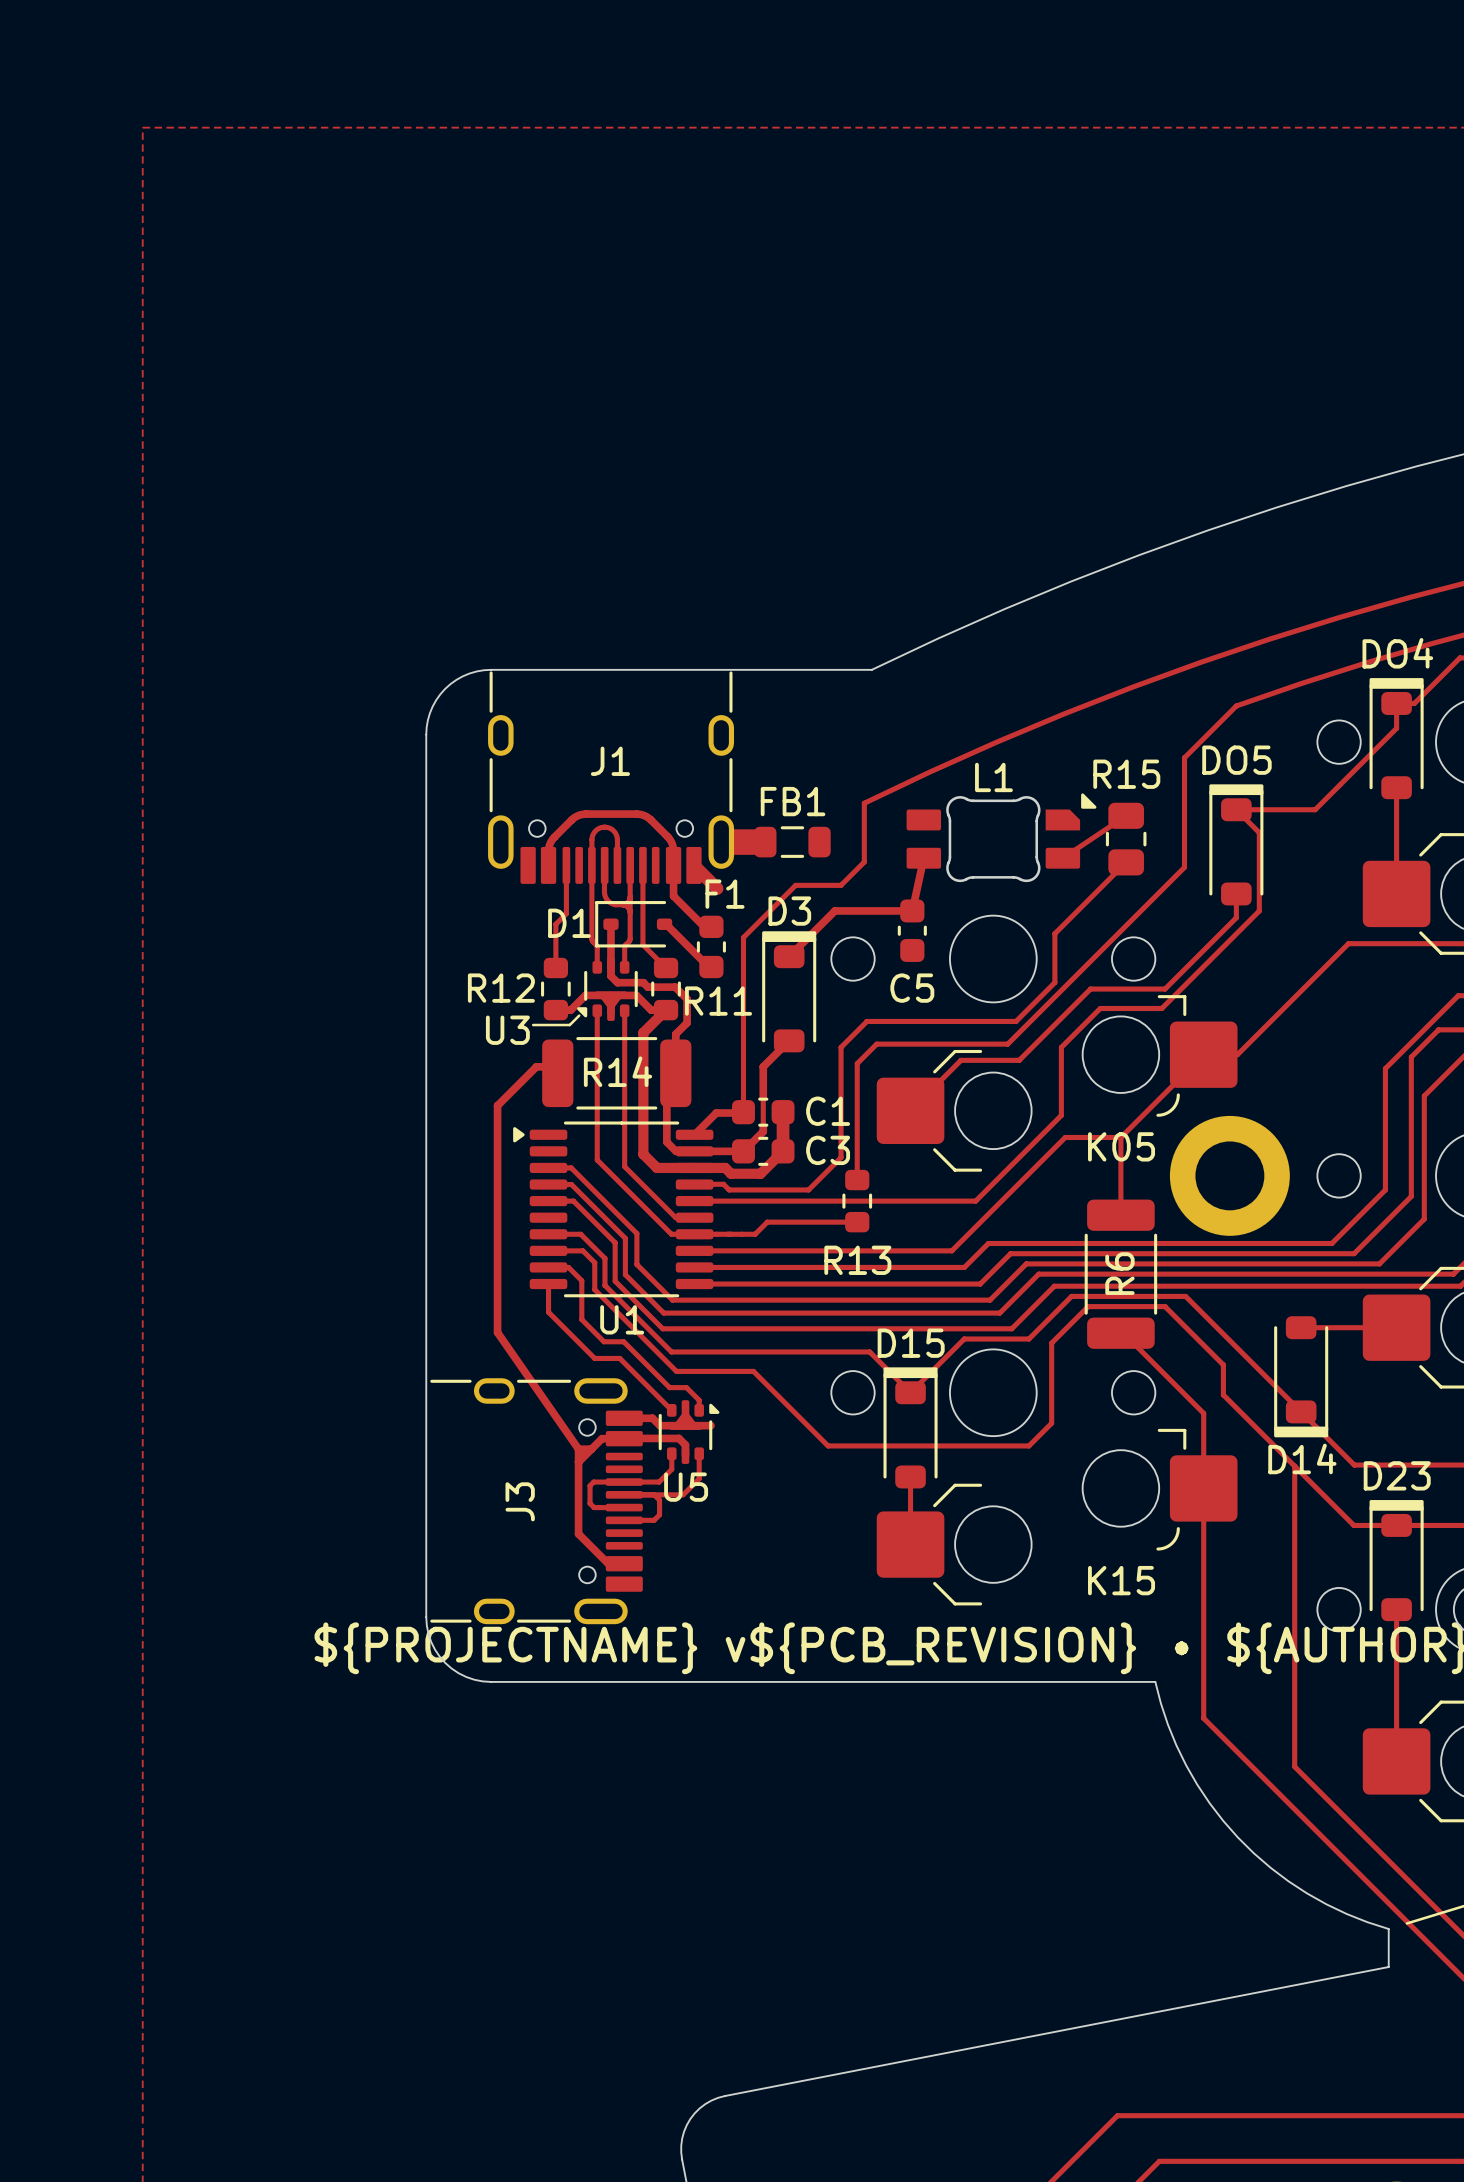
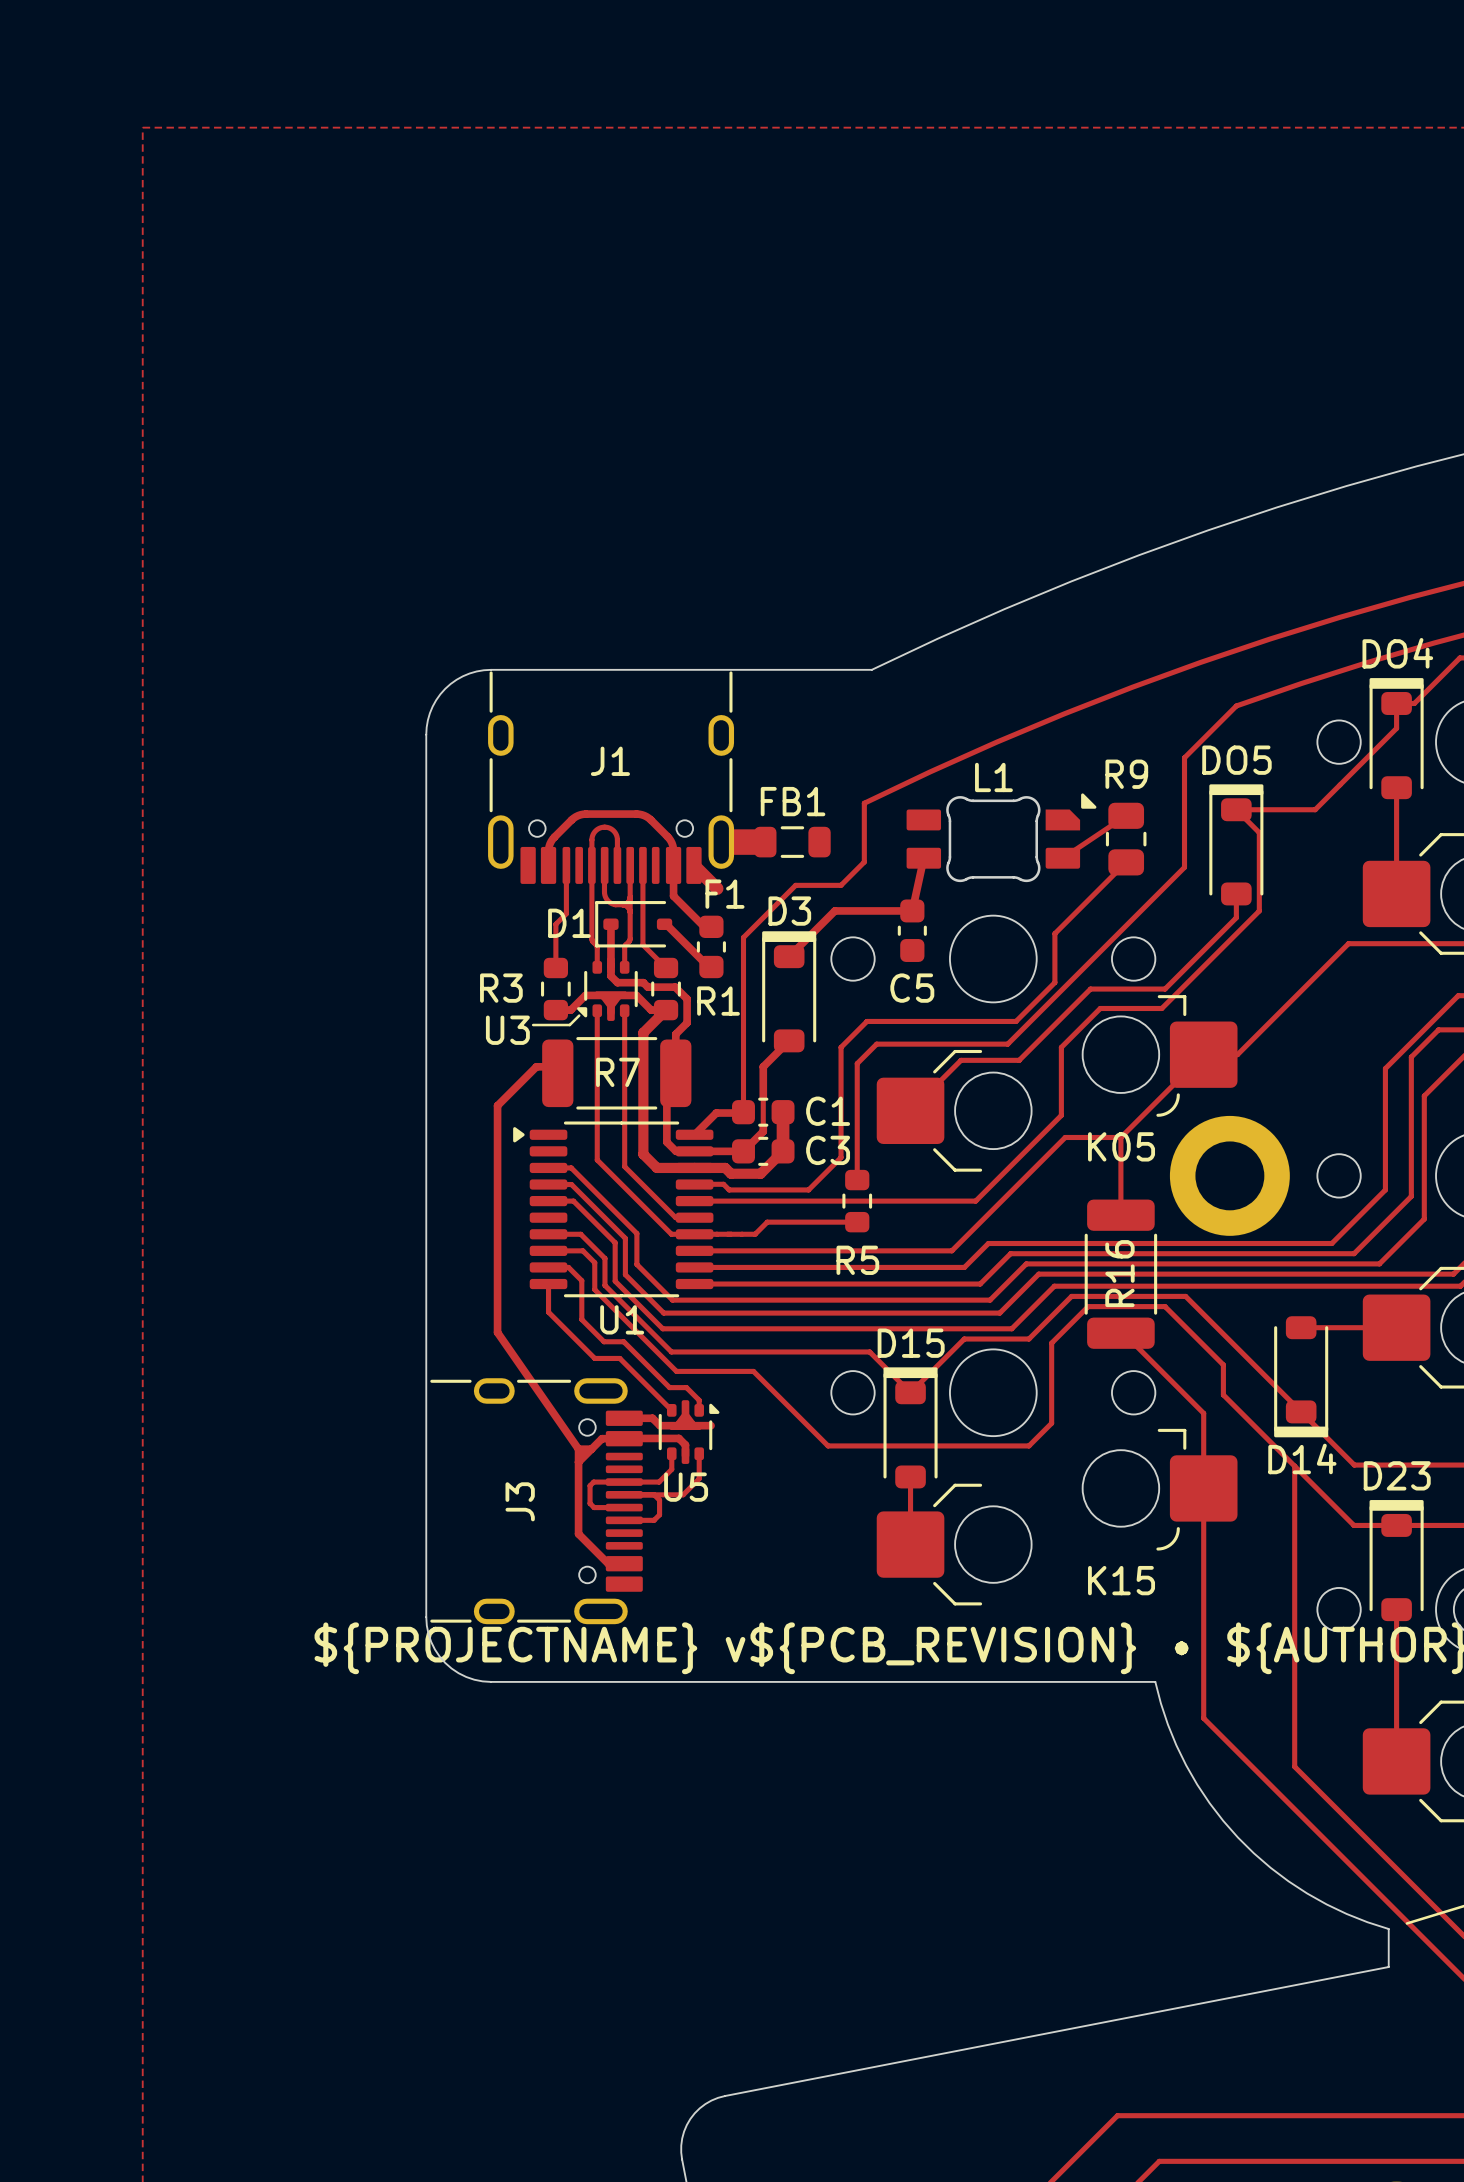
R15 name: R15 (1126, 774) -> R9 (1126, 774)
R12 name: R12 (501, 988) -> R3 (501, 988)
R11 name: R11 (718, 1001) -> R1 (718, 1001)
R14 name: R14 (618, 1071) -> R7 (618, 1072)
R13 name: R13 (857, 1260) -> R5 (857, 1260)
R6 name: R6 (1119, 1273) -> R16 (1119, 1273)

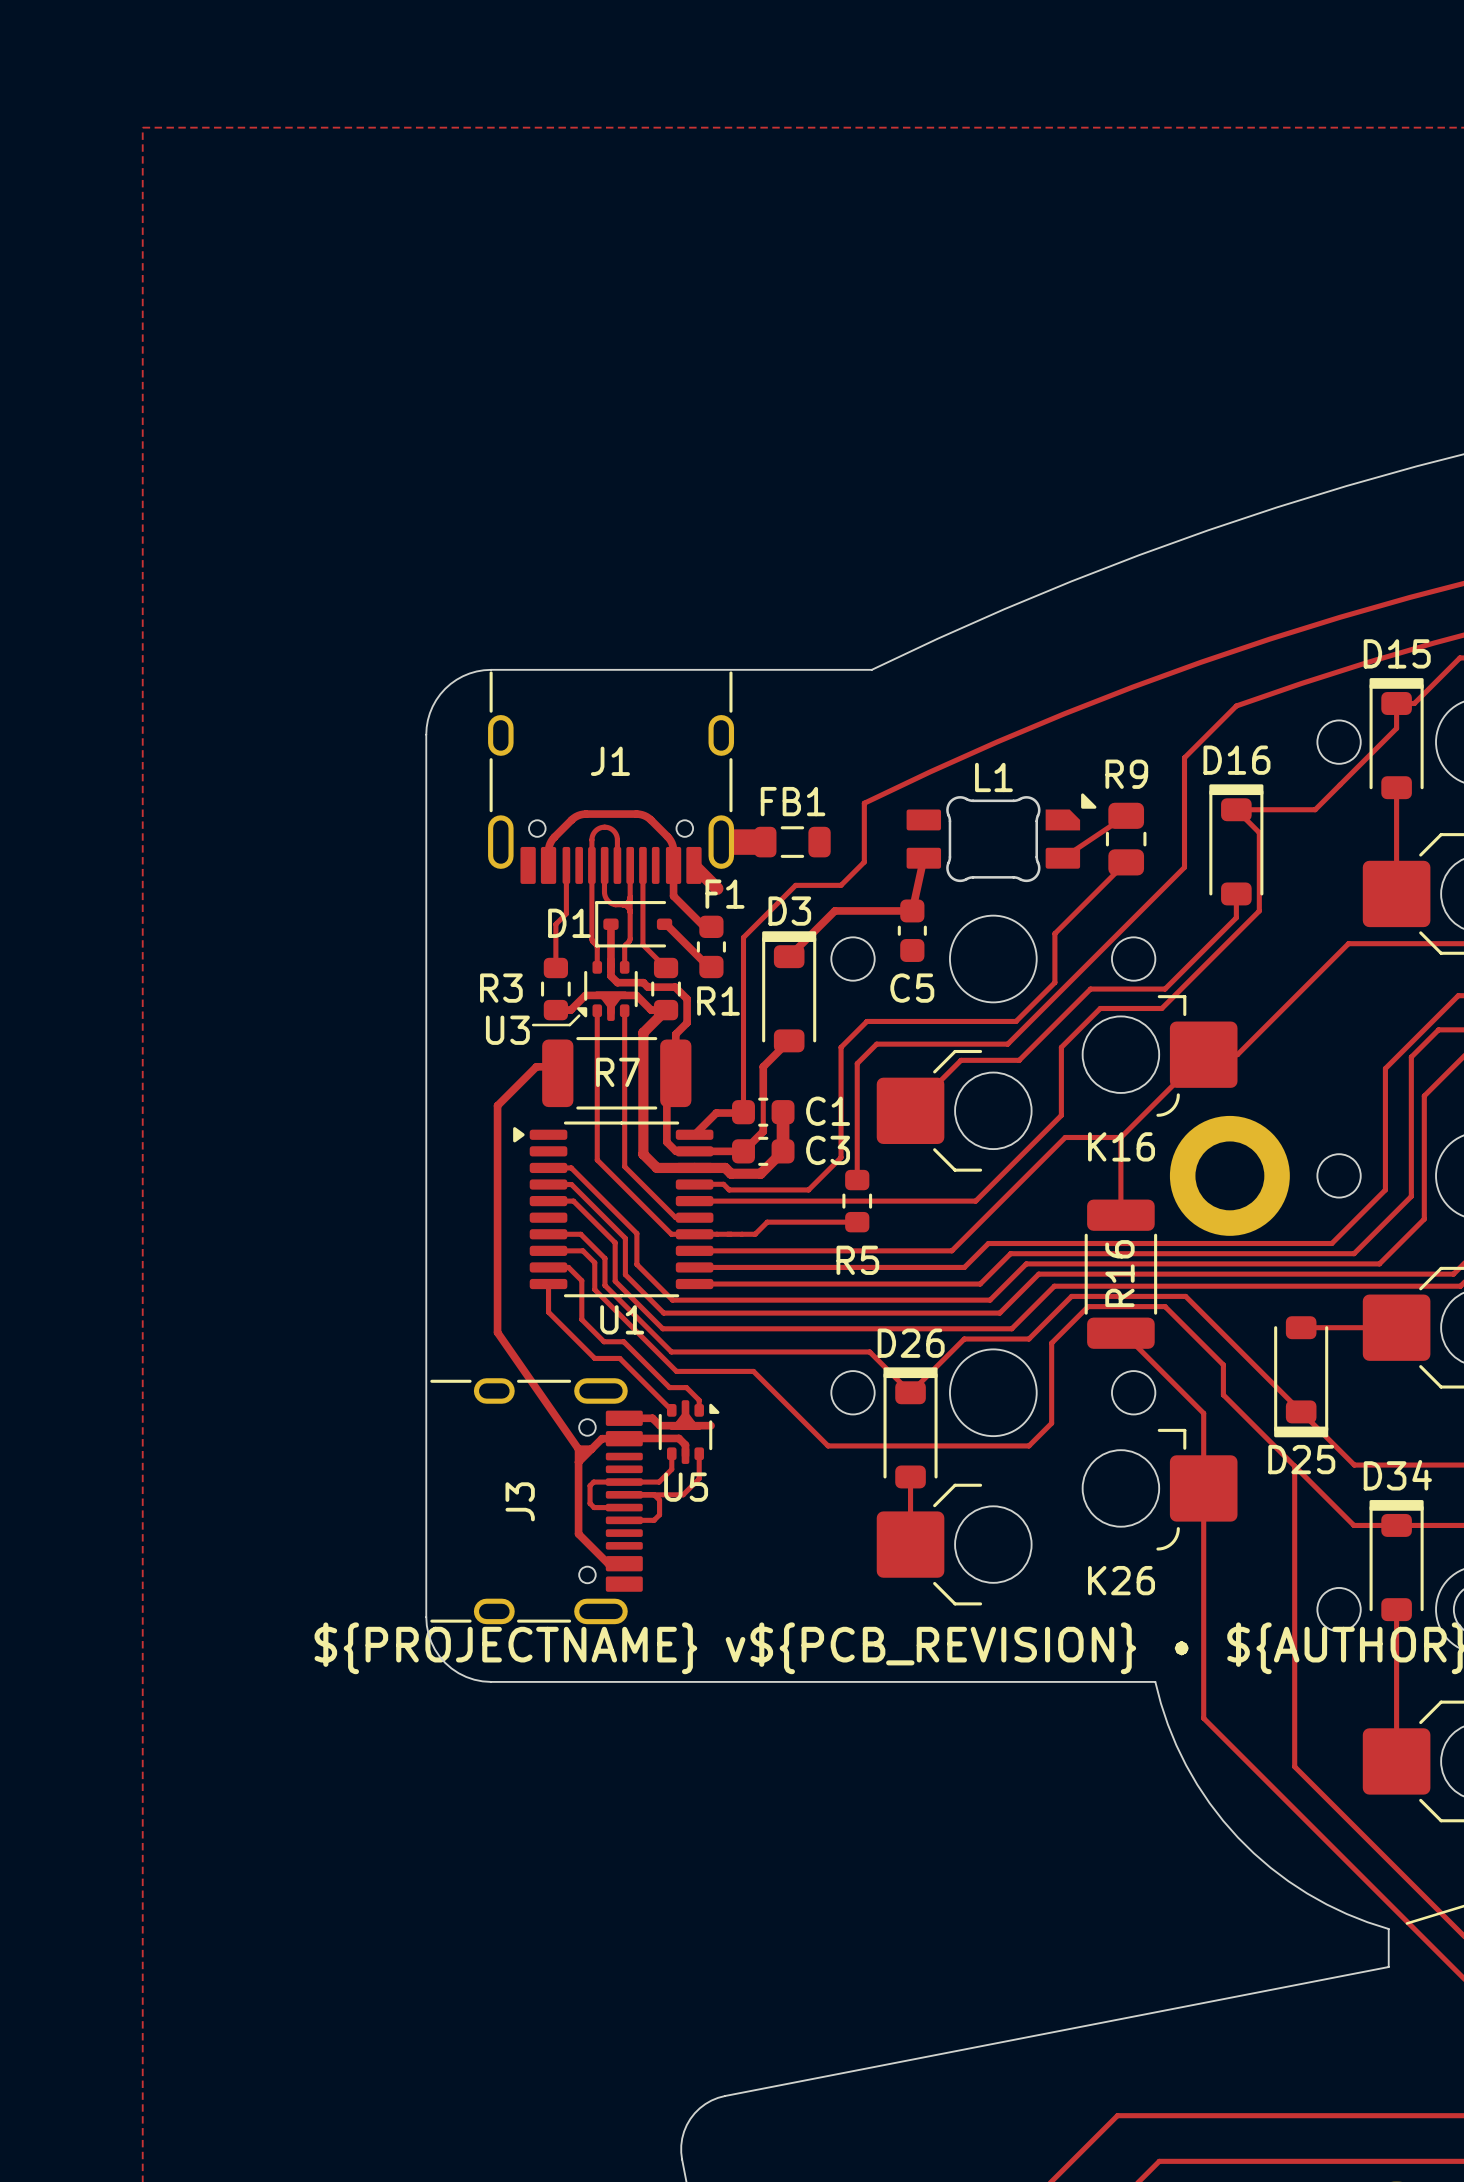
DO4 name: DO4 (1397, 653) -> D15 (1397, 653)
DO5 name: DO5 (1236, 760) -> D16 (1236, 760)
K05 name: K05 (1121, 1146) -> K16 (1121, 1146)
D15 name: D15 (911, 1343) -> D26 (911, 1343)
D14 name: D14 (1302, 1458) -> D25 (1301, 1459)
D23 name: D23 (1397, 1475) -> D34 (1397, 1475)
K15 name: K15 (1121, 1580) -> K26 (1121, 1580)

